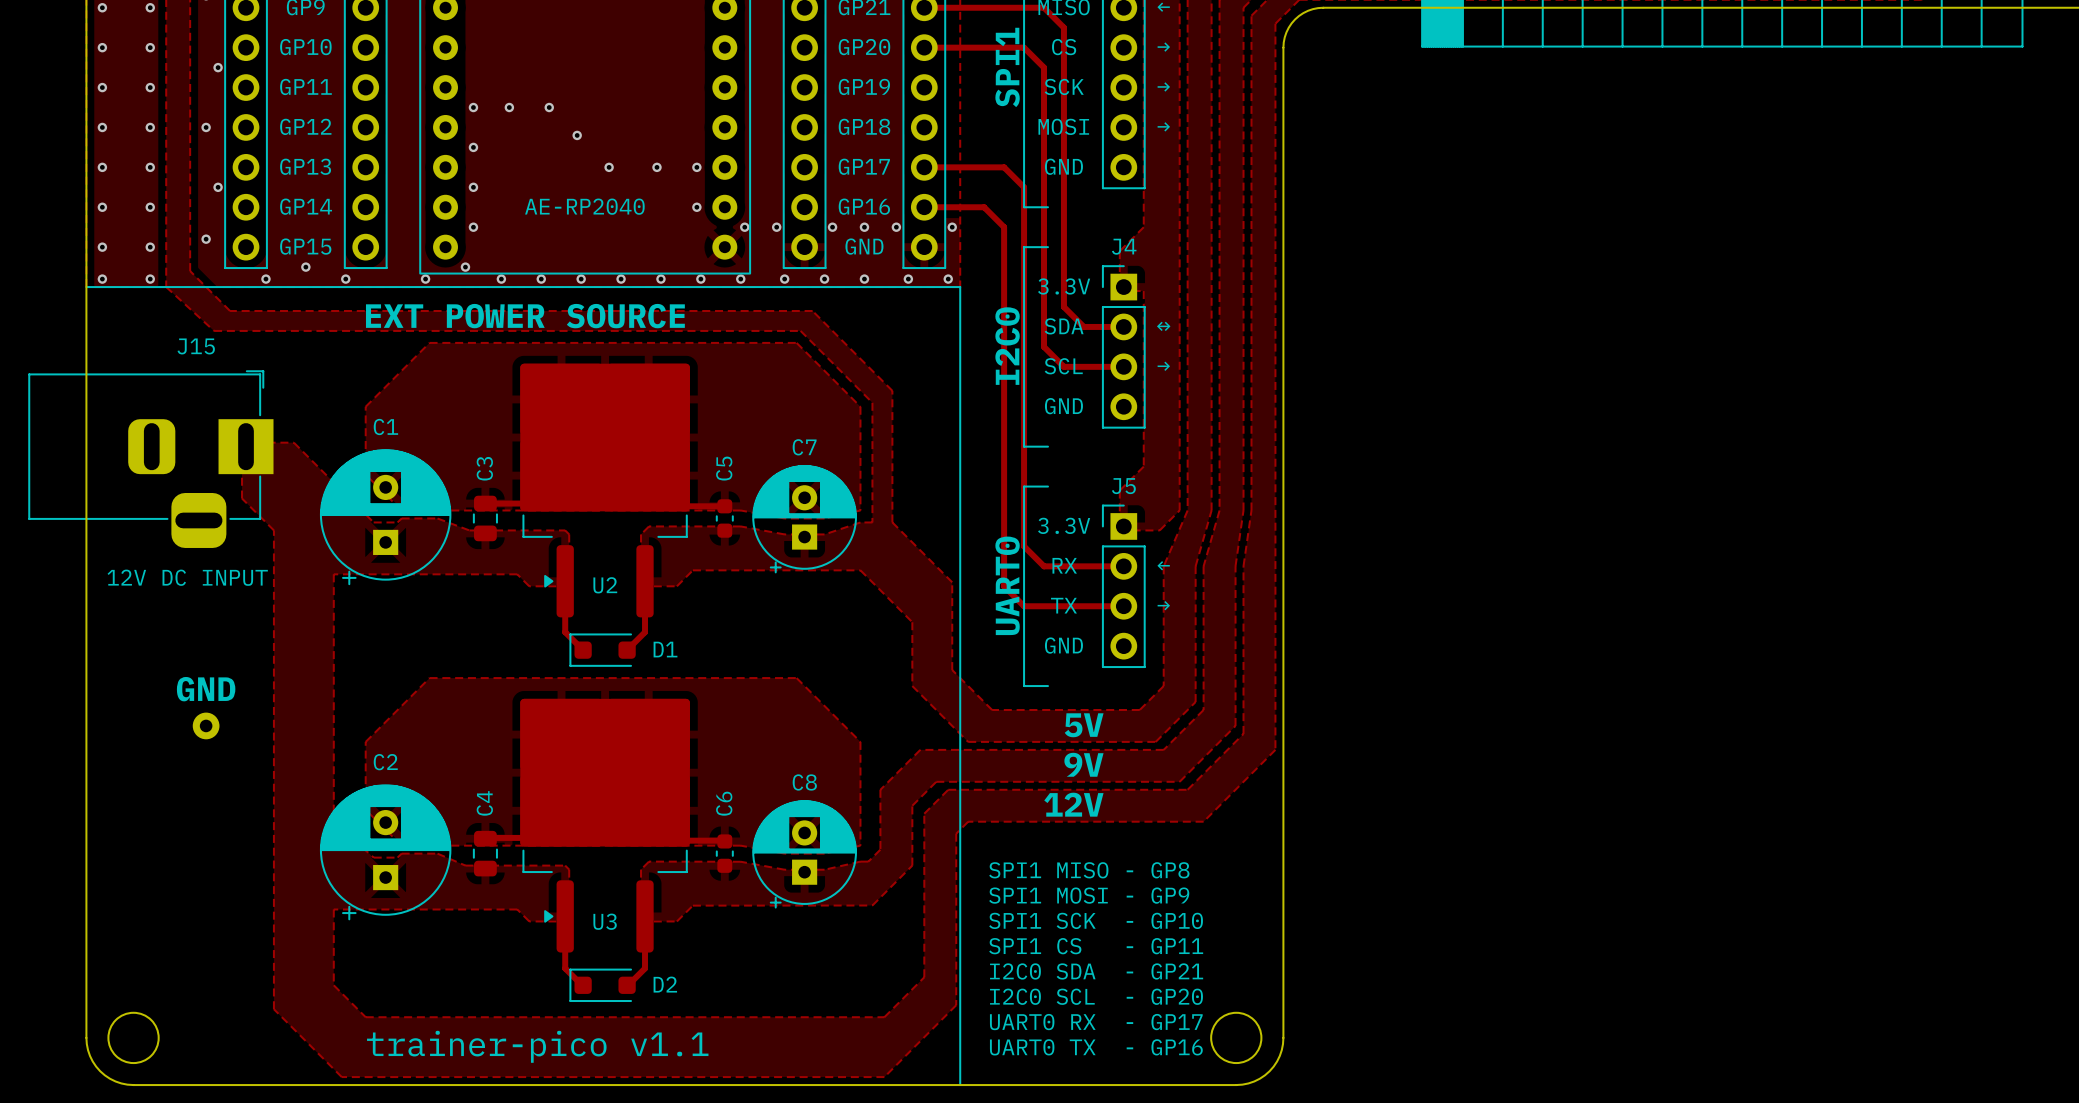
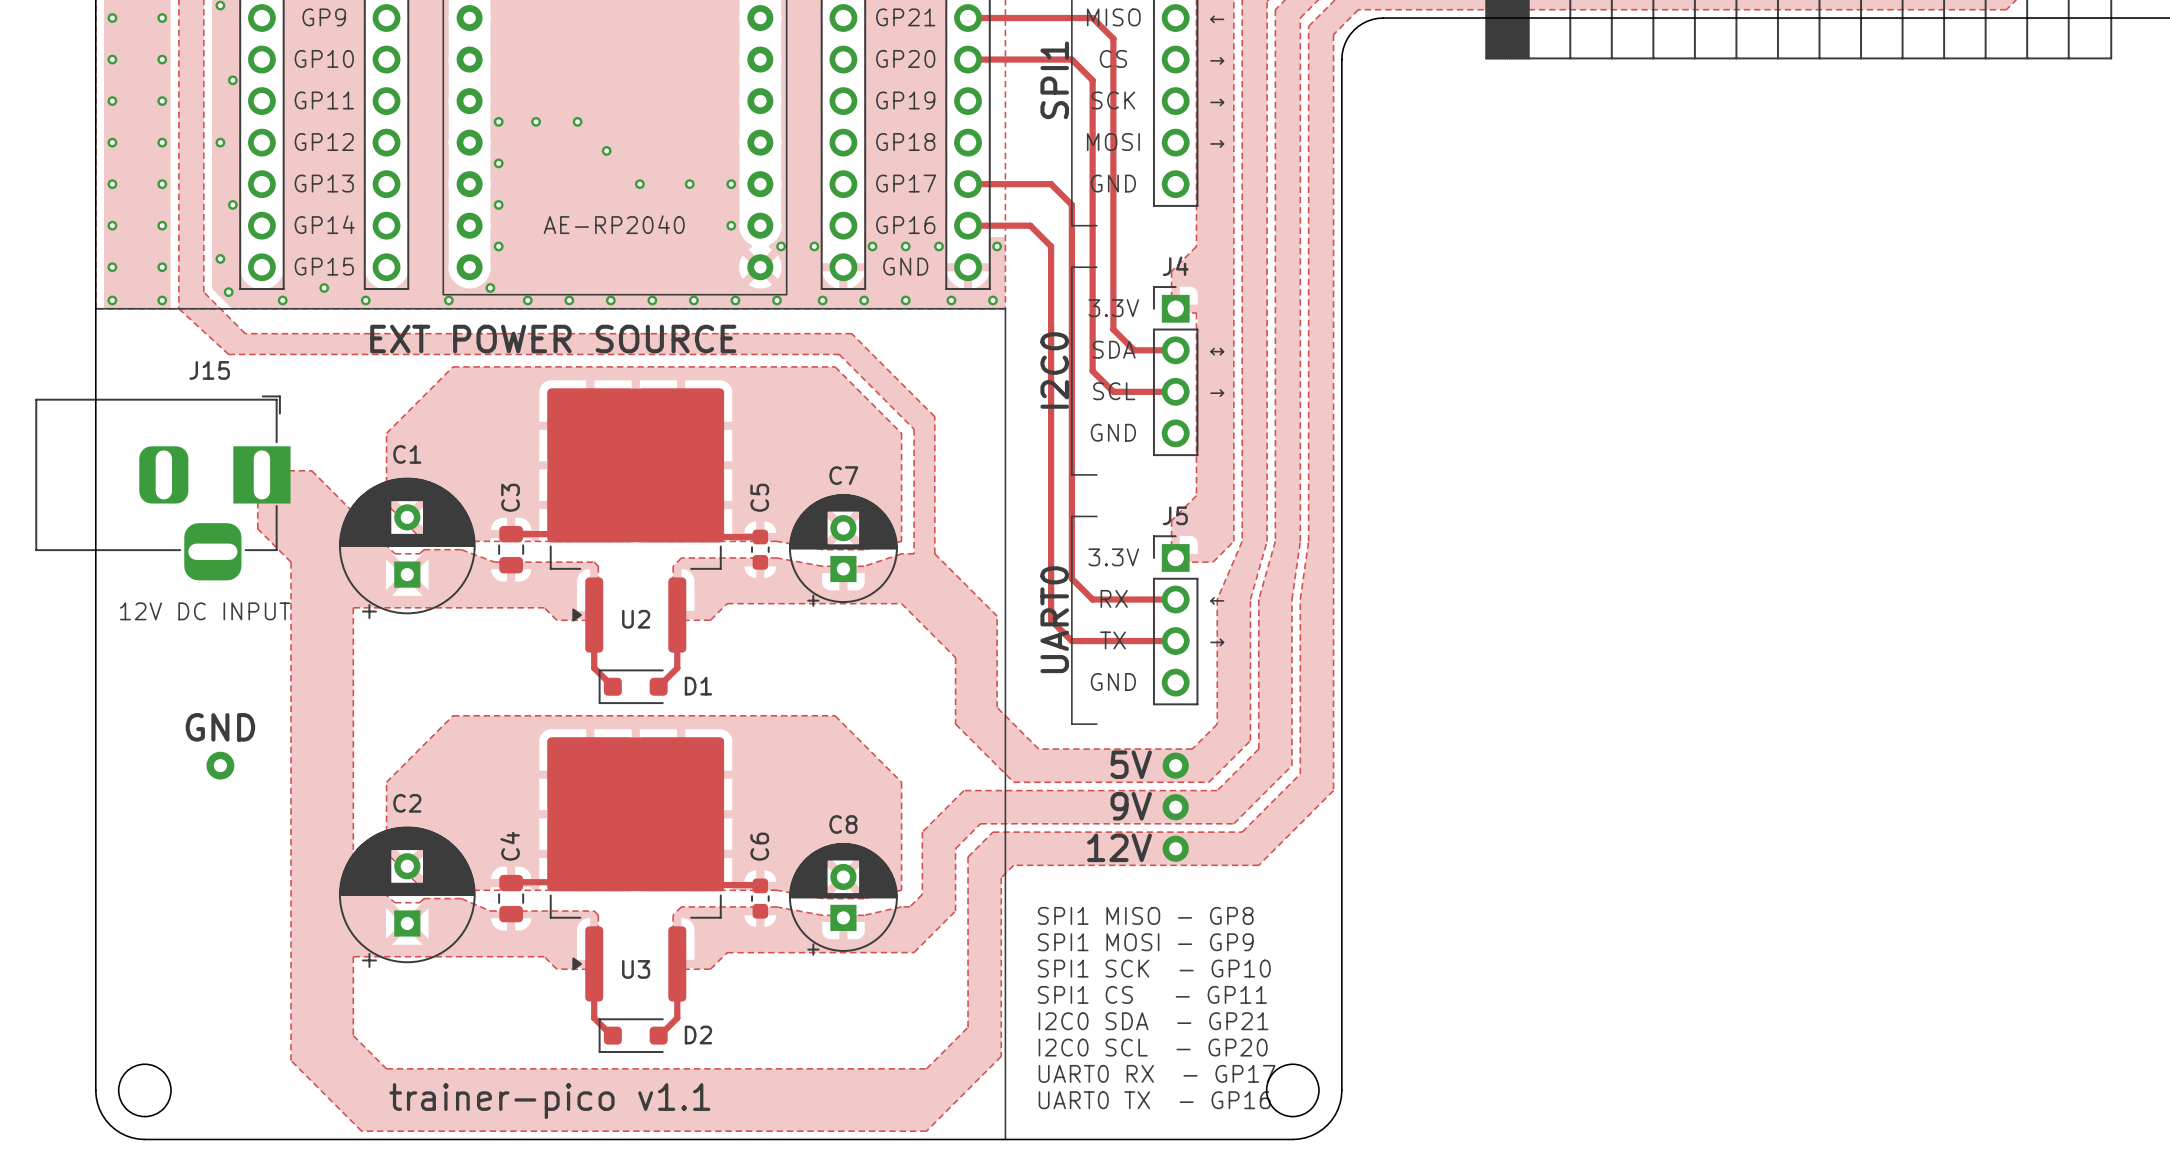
via: none -> (228, 292)
part: none -> (1175, 765)
part: none -> (1175, 807)
part: none -> (1175, 848)

